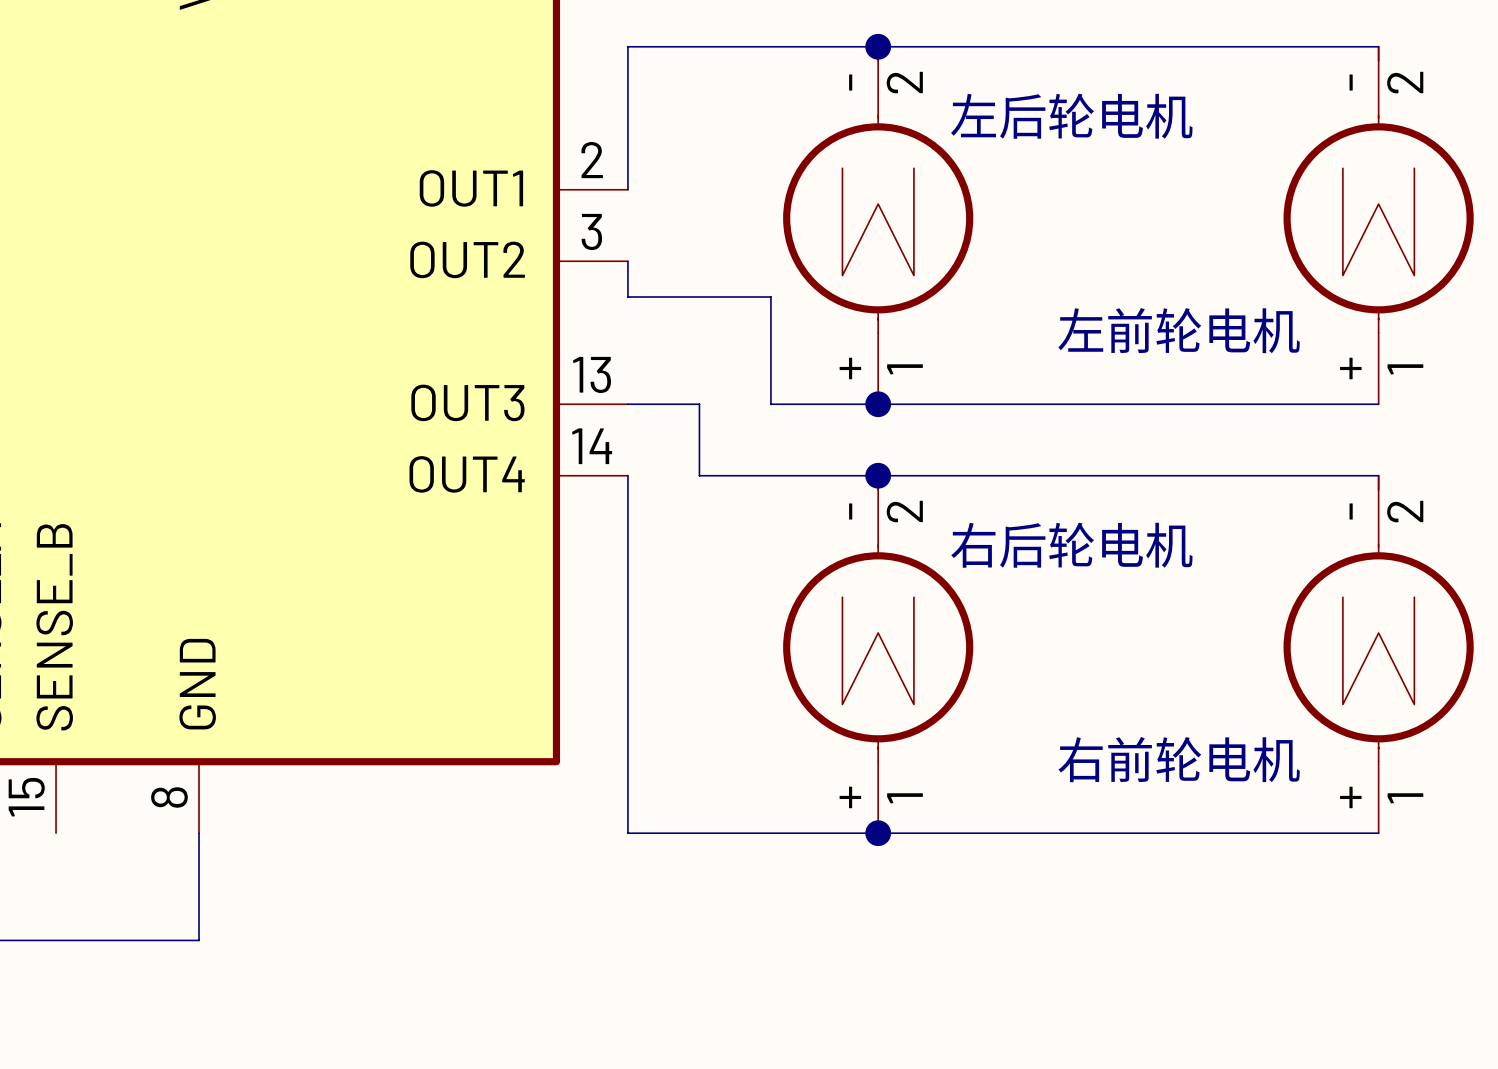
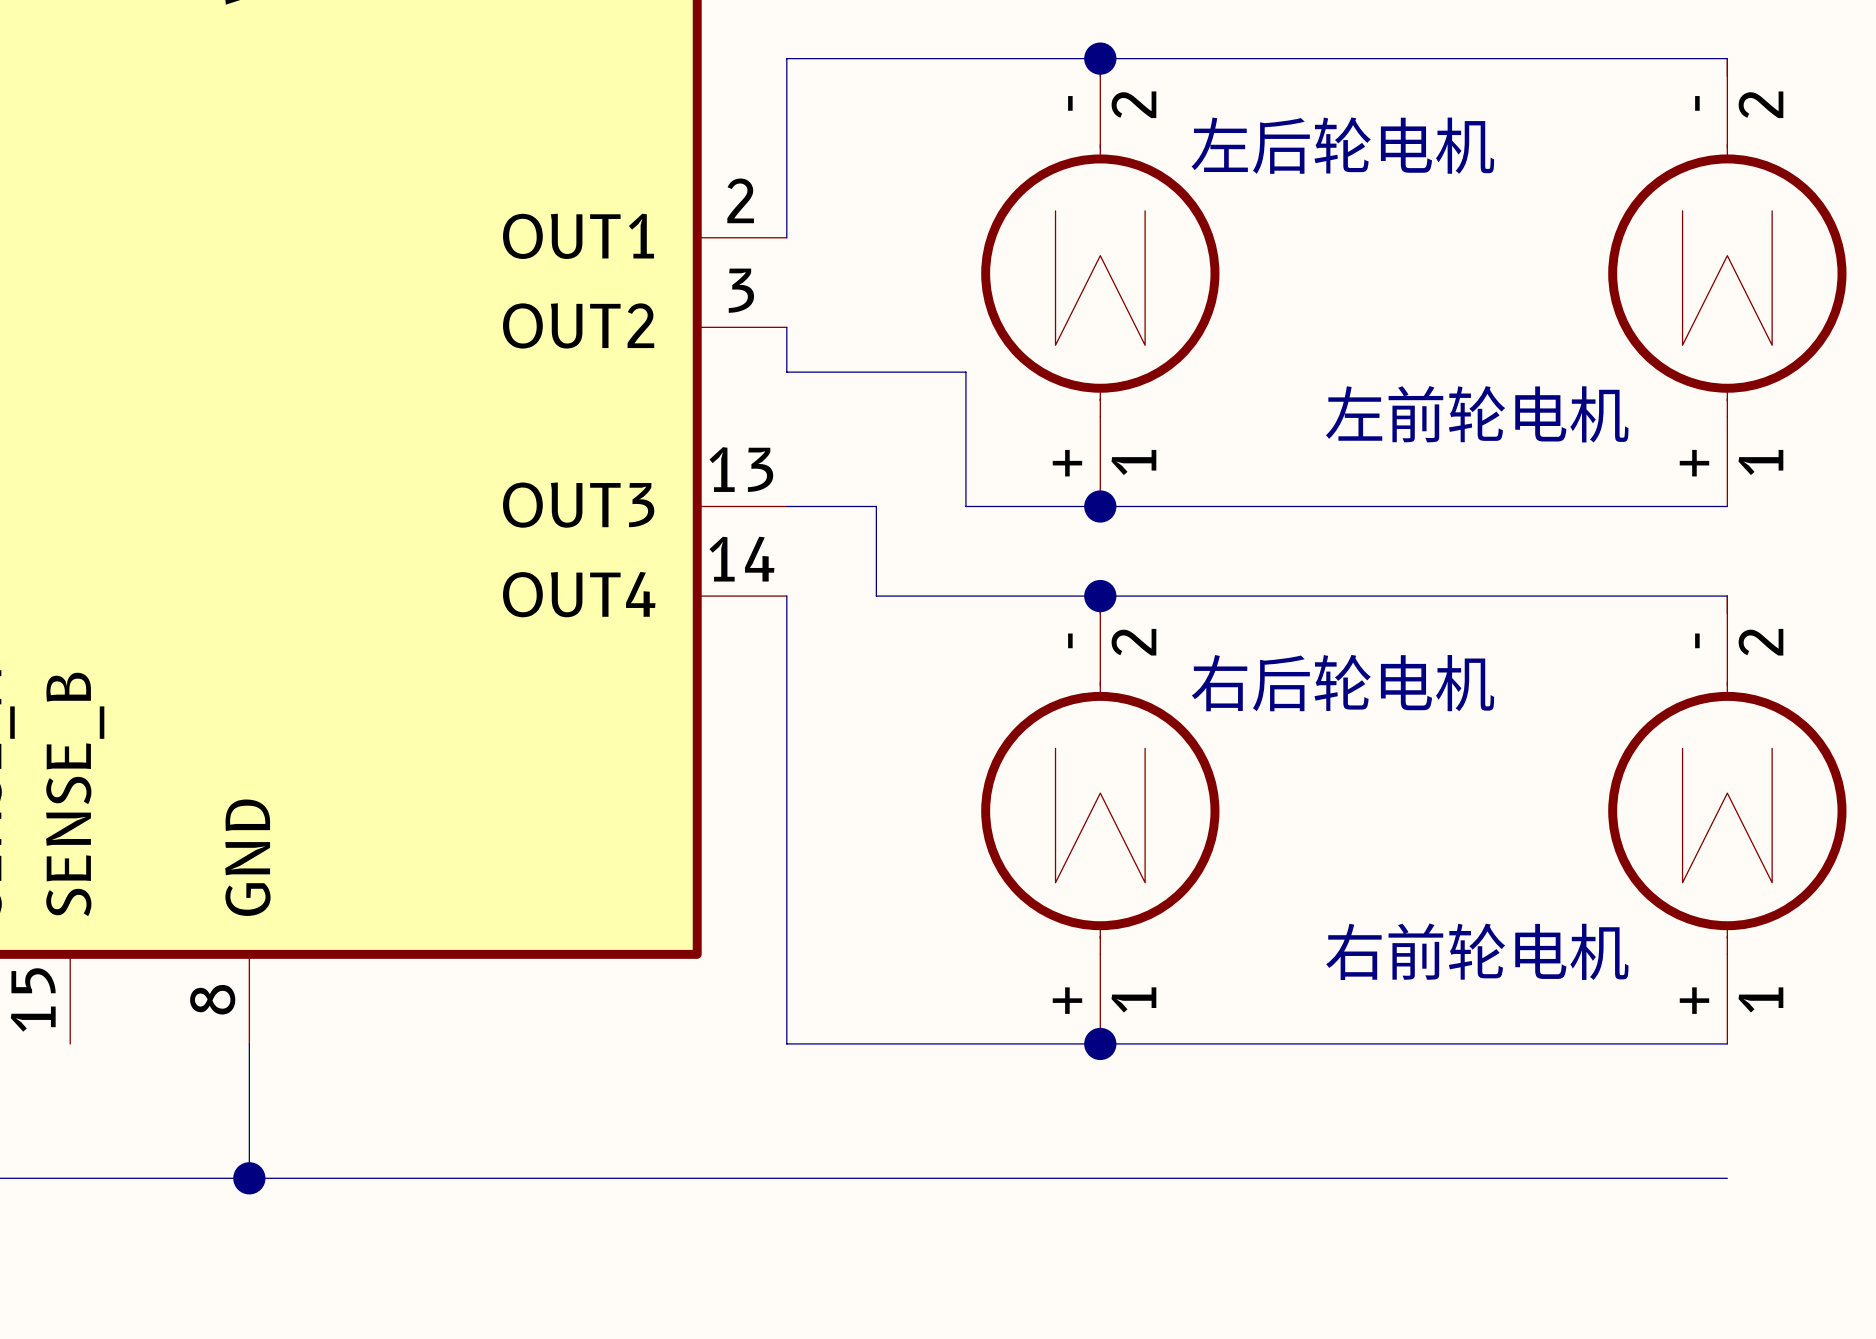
wire: none -> (249, 1178) (1727, 1178)
junction: none -> (249, 1178)

